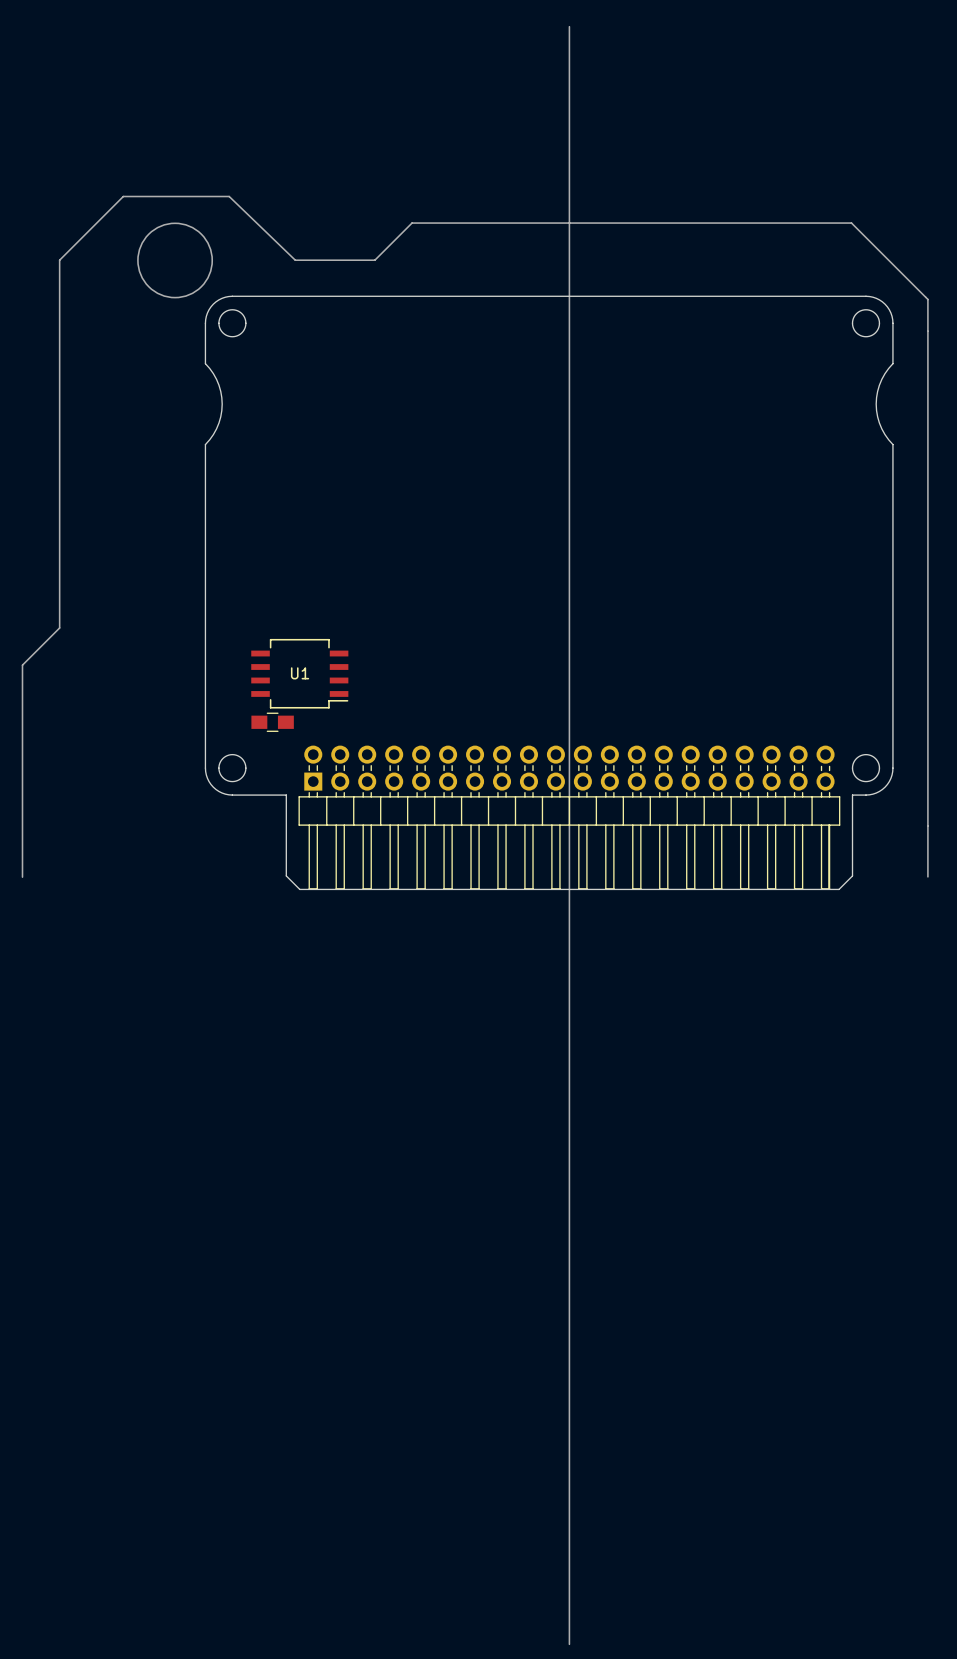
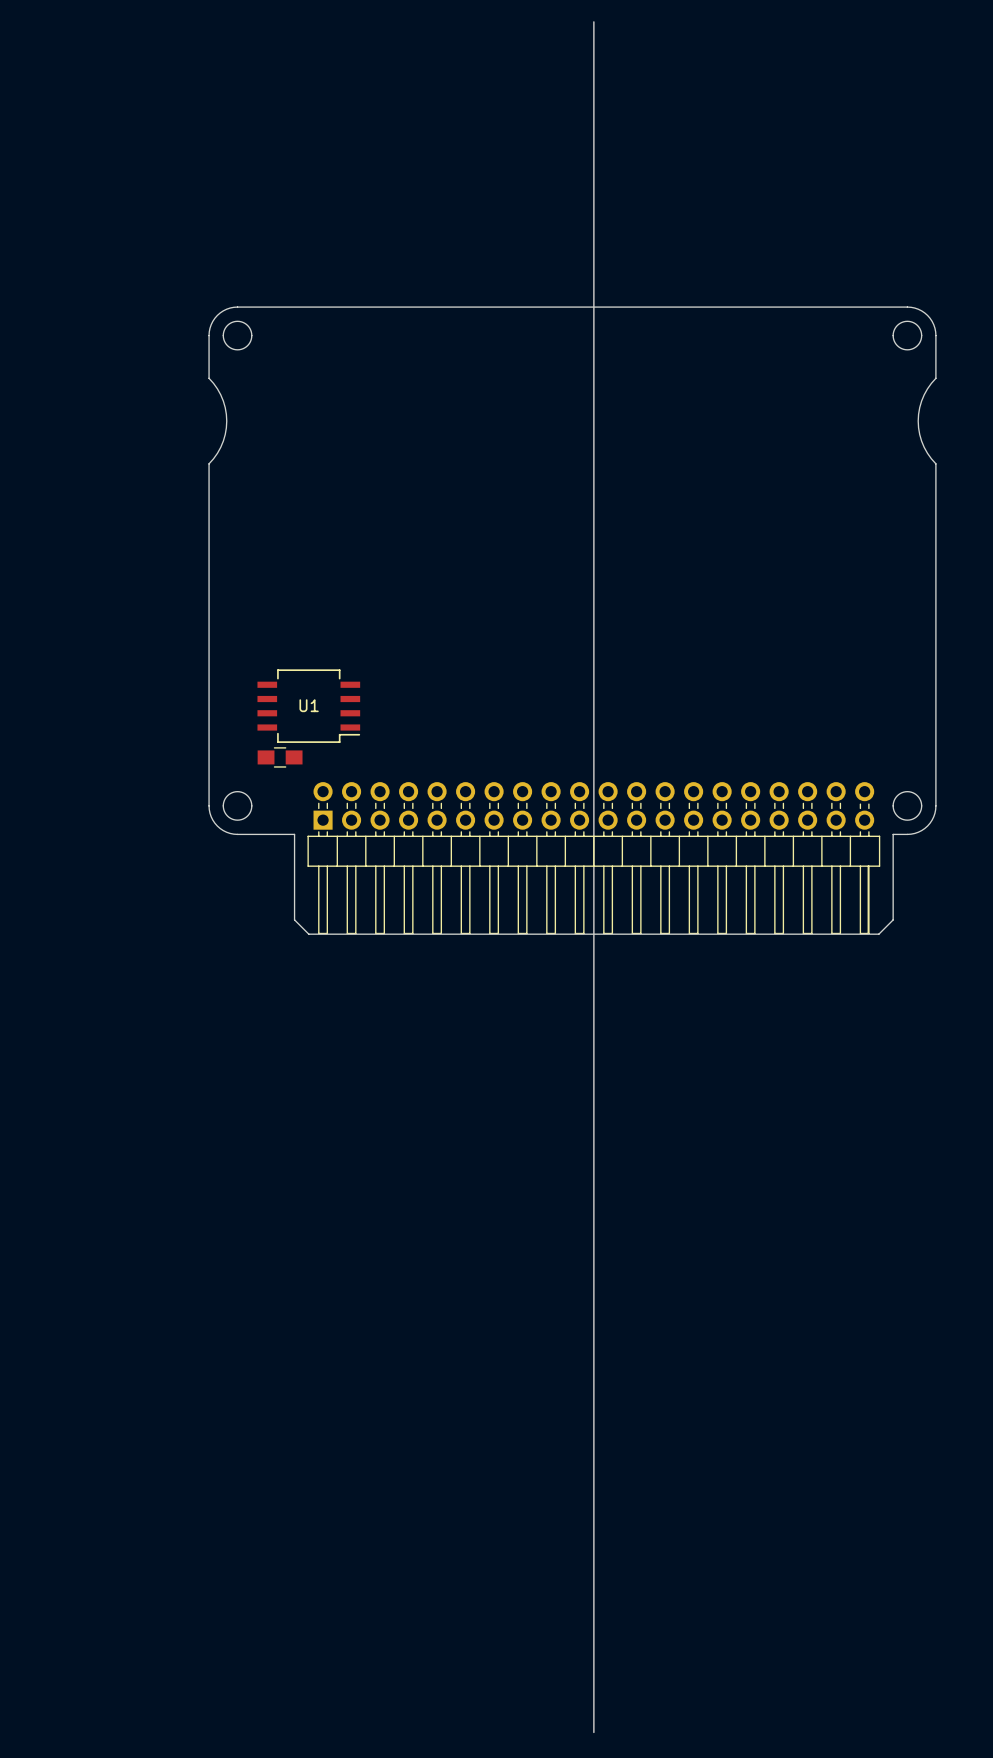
drawing: [137, 222, 214, 299] -> none
line: (927, 876) (927, 299) (851, 223) (412, 223) (374, 260) (295, 260) (229, 196) (123, 196) (59, 260) (59, 627) (22, 665) (22, 877) -> none

